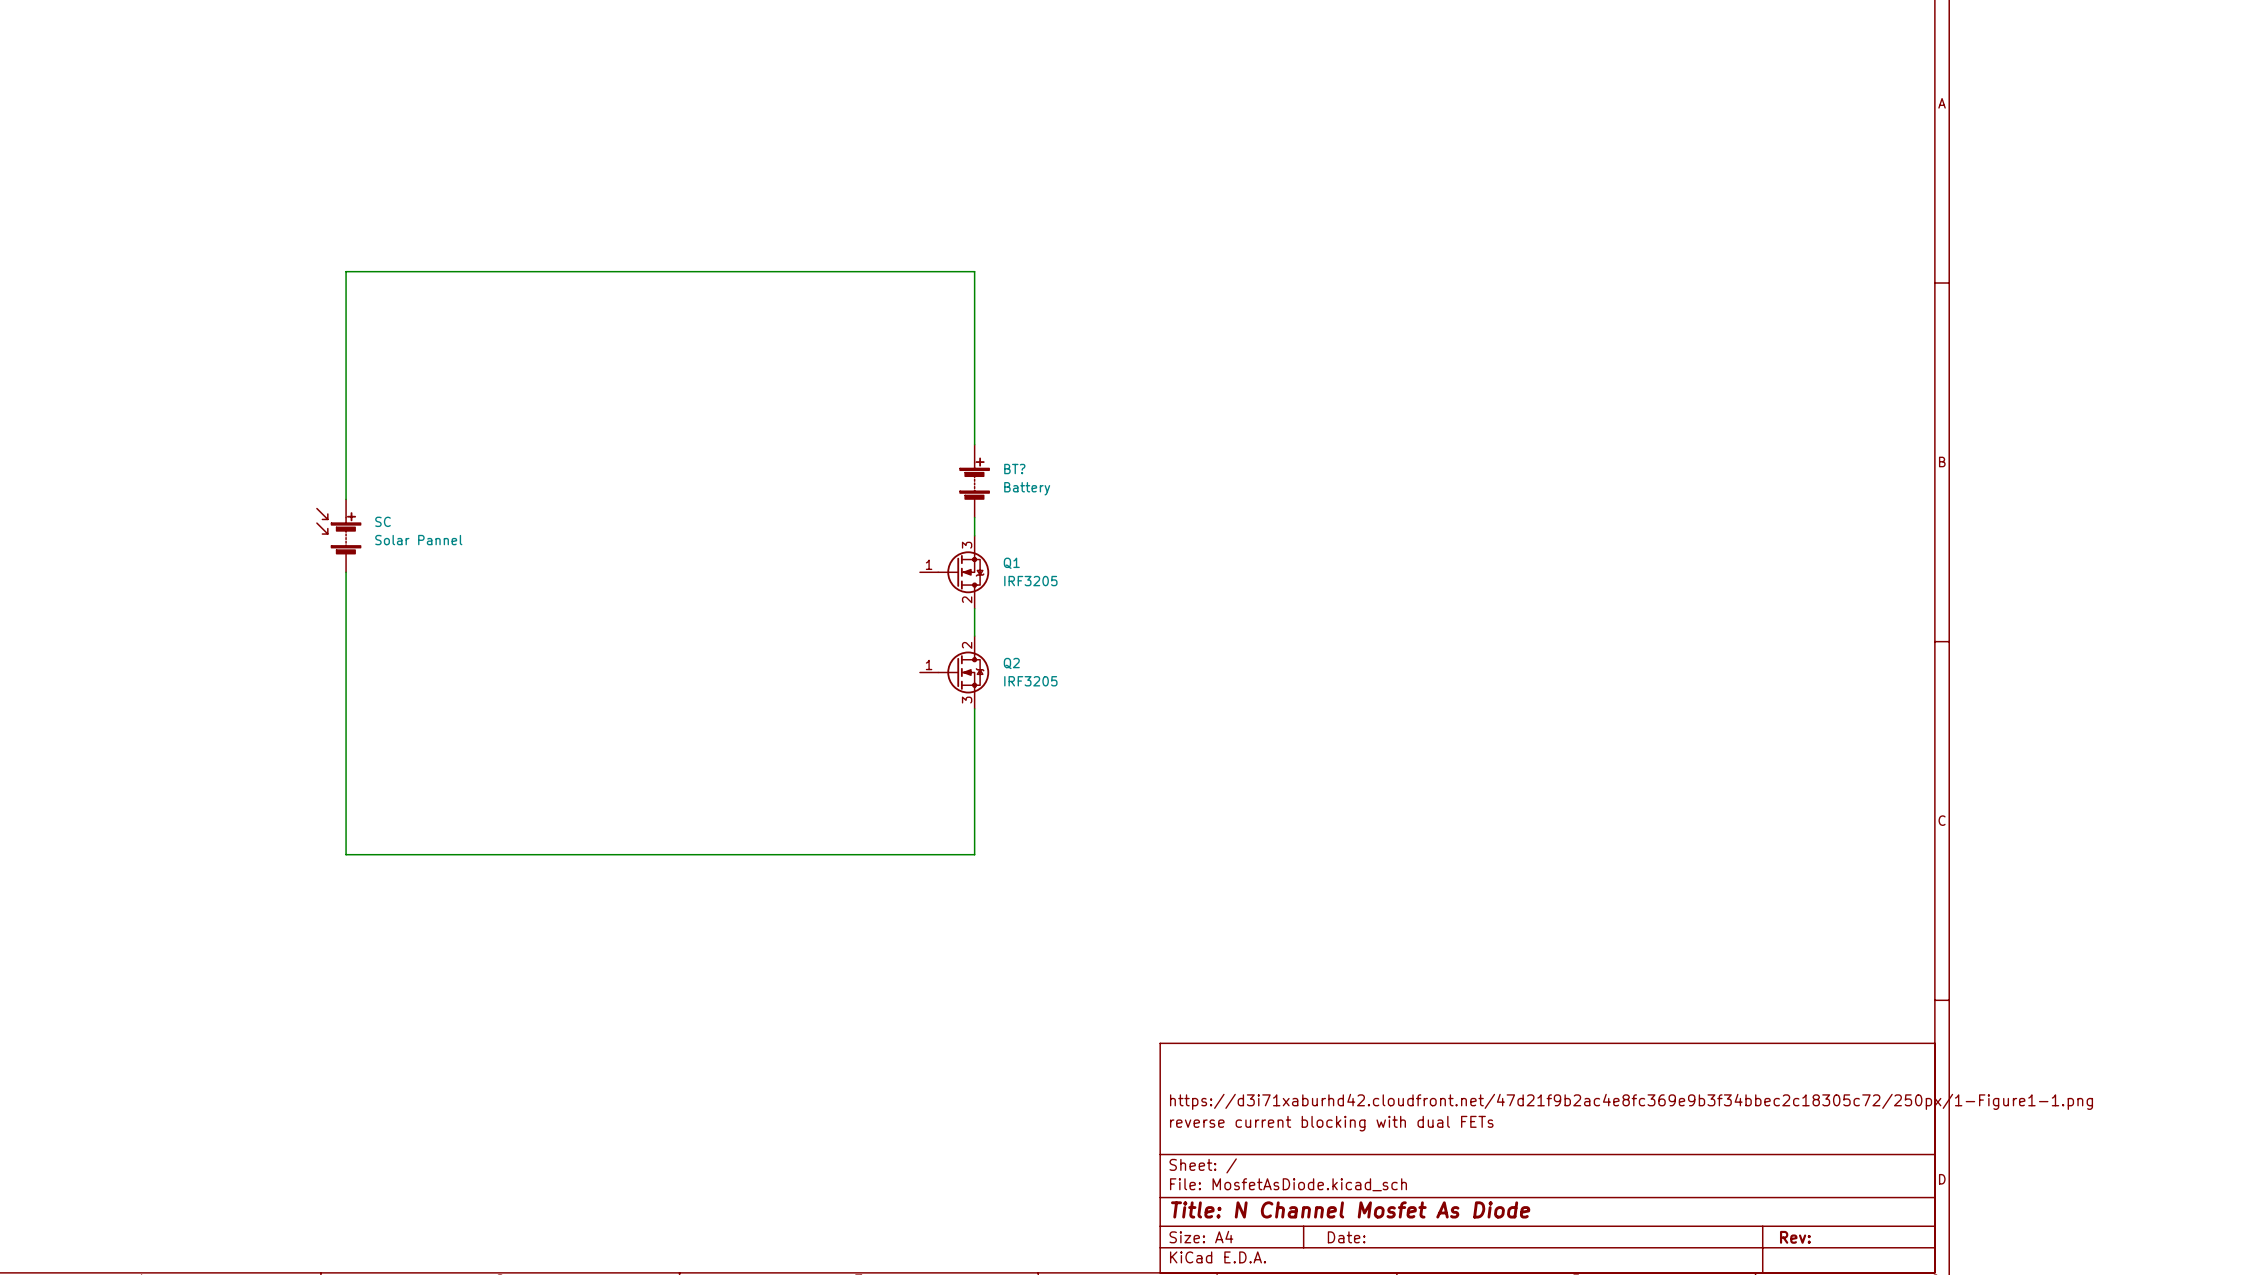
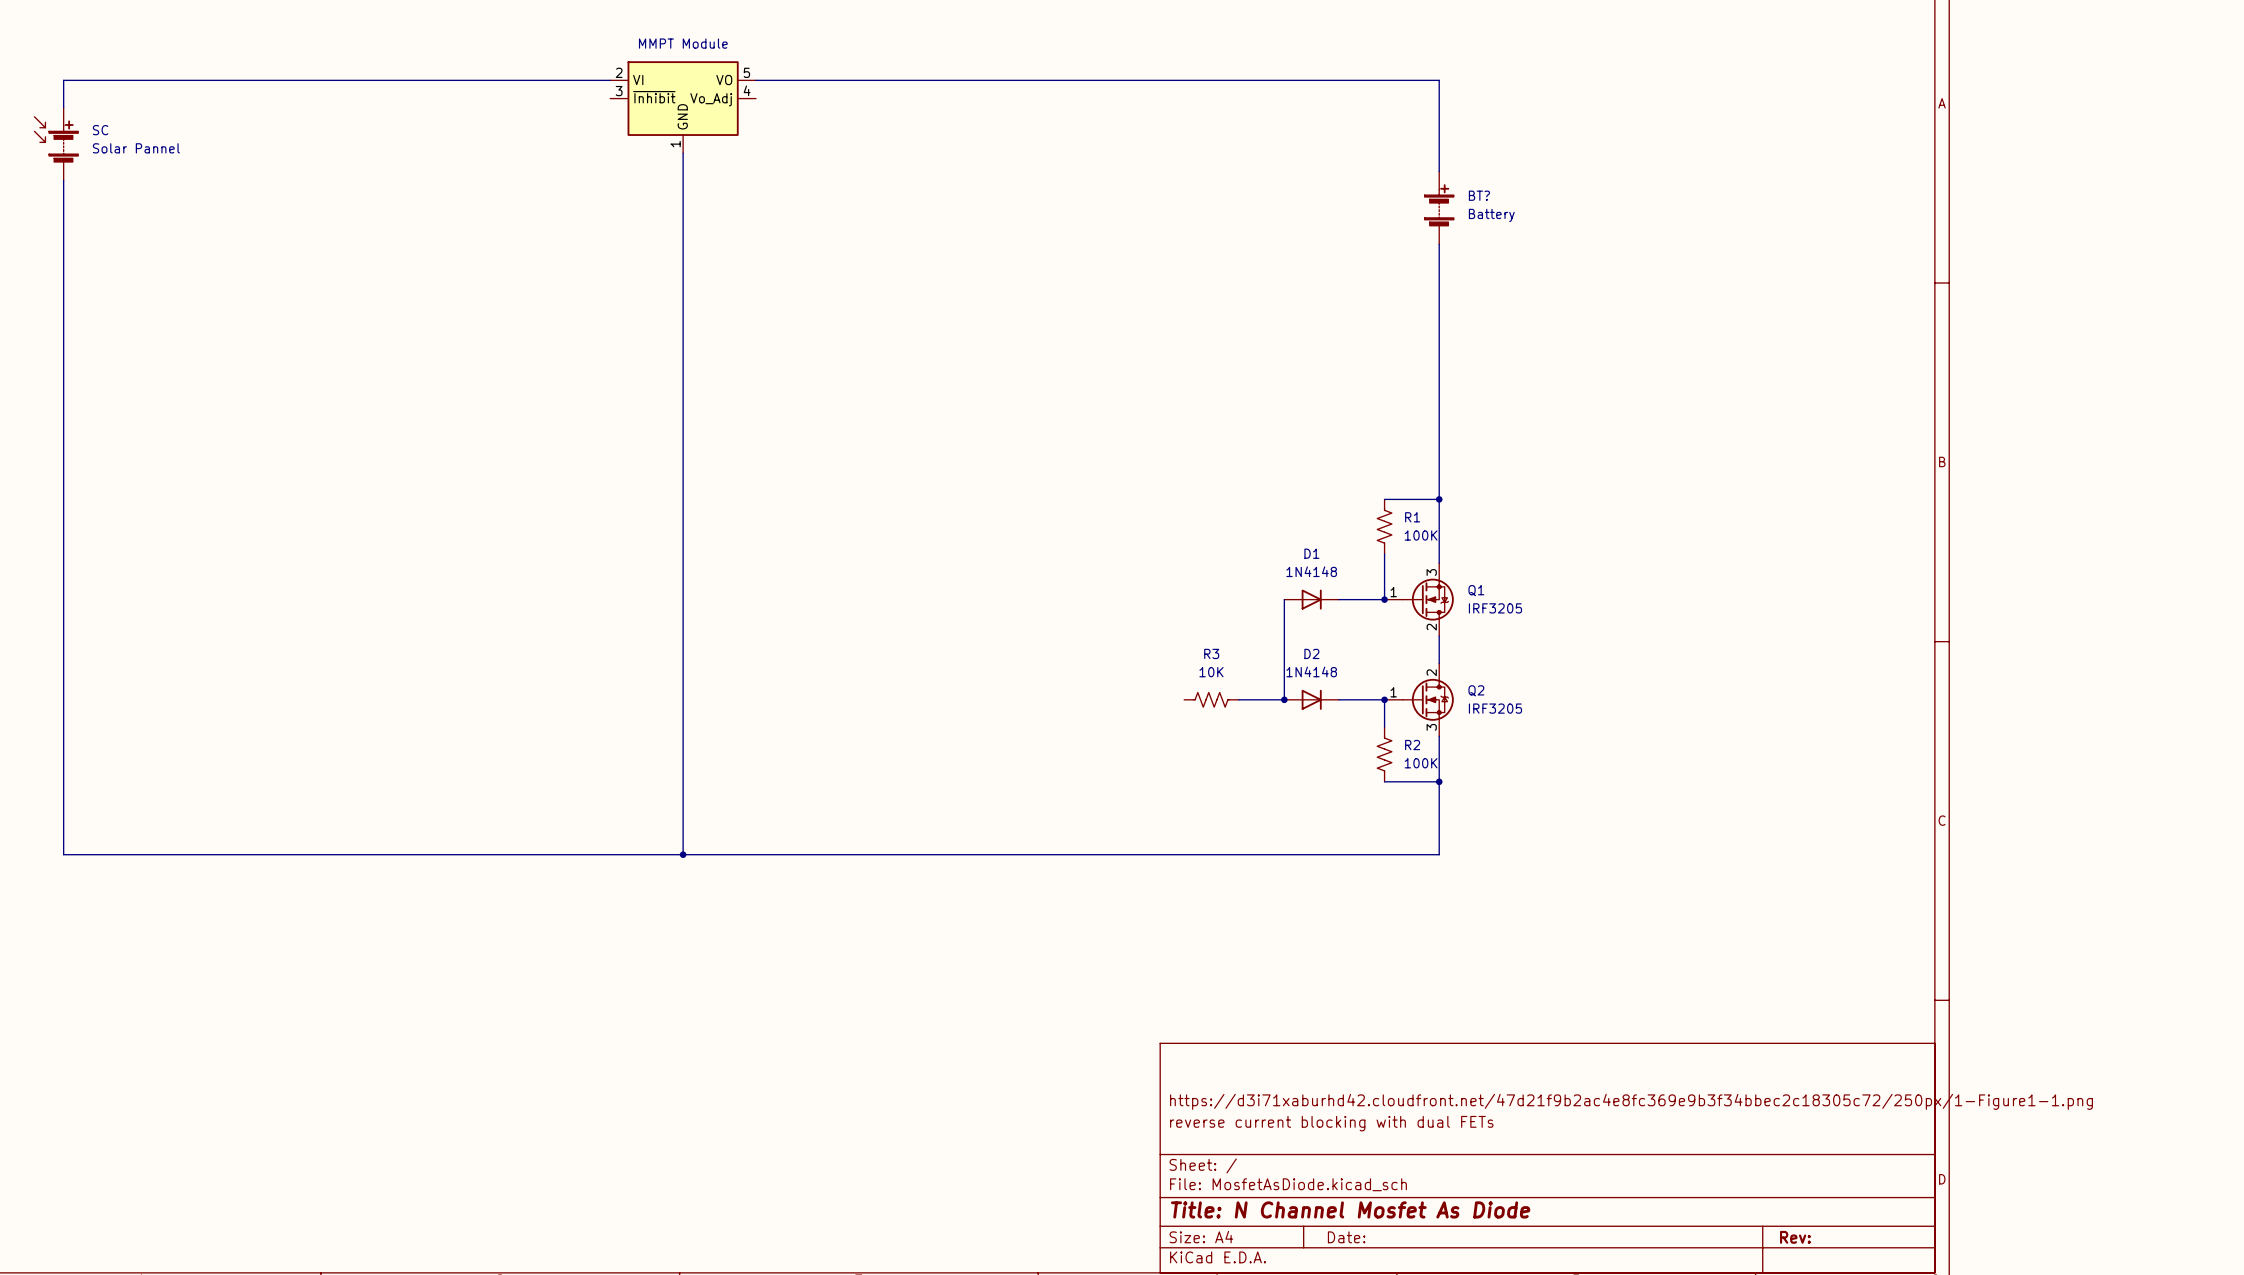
wire: none -> (610, 80) (63, 80) (63, 107)
wire: none -> (755, 80) (1439, 80) (1439, 171)
part: none -> MMPT Module (683, 107)
SC: none -> Solar Pannel (56, 144)
wire: none -> (683, 153) (683, 854)
BT?: none -> Battery (1439, 207)
wire: none -> (1439, 244) (1439, 563)
wire: (974, 444) (974, 271) (346, 271) (346, 499) -> none
BT?: Battery (974, 481) -> none
wire: none -> (1384, 499) (1439, 499)
junction: none -> (1439, 499)
wire: (974, 517) (974, 535) -> none
R1: none -> 100K (1384, 526)
SC: Solar Pannel (338, 535) -> none
wire: none -> (1384, 554) (1384, 599) (1339, 599)
wire: (346, 572) (346, 854) -> (63, 180) (63, 854) (346, 854)
Q1 position: (954, 572) -> (1419, 599)
wire: none -> (1284, 599) (1284, 699) (1238, 699)
D1: none -> 1N4148 (1311, 599)
junction: none -> (1384, 599)
wire: (974, 608) (974, 636) -> none
wire: none -> (1439, 636) (1439, 663)
Q2 position: (954, 672) -> (1419, 699)
R3: none -> 10K (1211, 699)
junction: none -> (1284, 699)
D2: none -> 1N4148 (1311, 699)
wire: none -> (1339, 699) (1384, 699) (1384, 727)
junction: none -> (1384, 699)
wire: (974, 708) (974, 854) -> (1439, 736) (1439, 854) (974, 854)
R2: none -> 100K (1384, 754)
wire: none -> (1384, 781) (1439, 781)
junction: none -> (1439, 781)
junction: none -> (683, 854)

